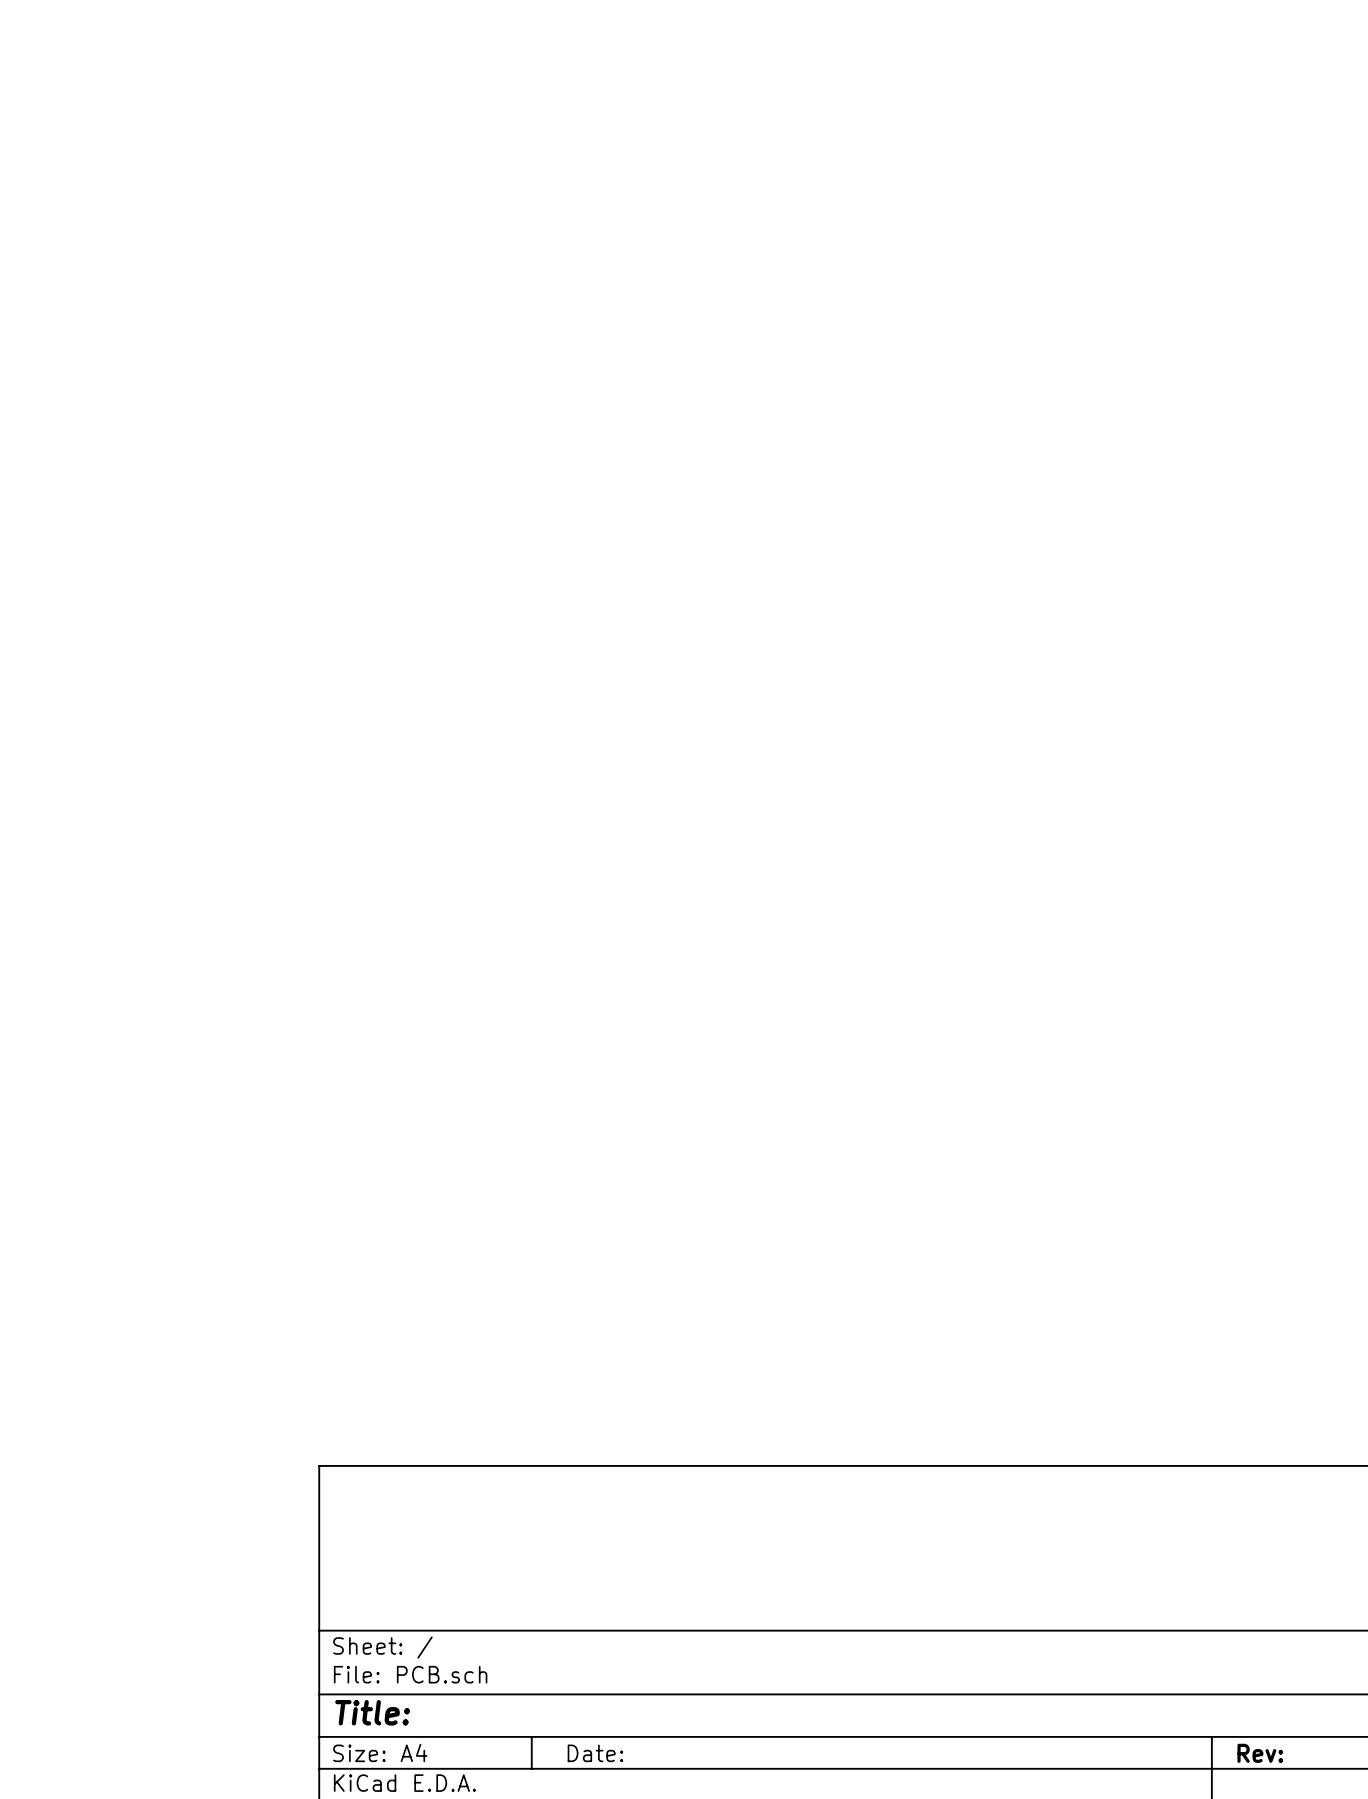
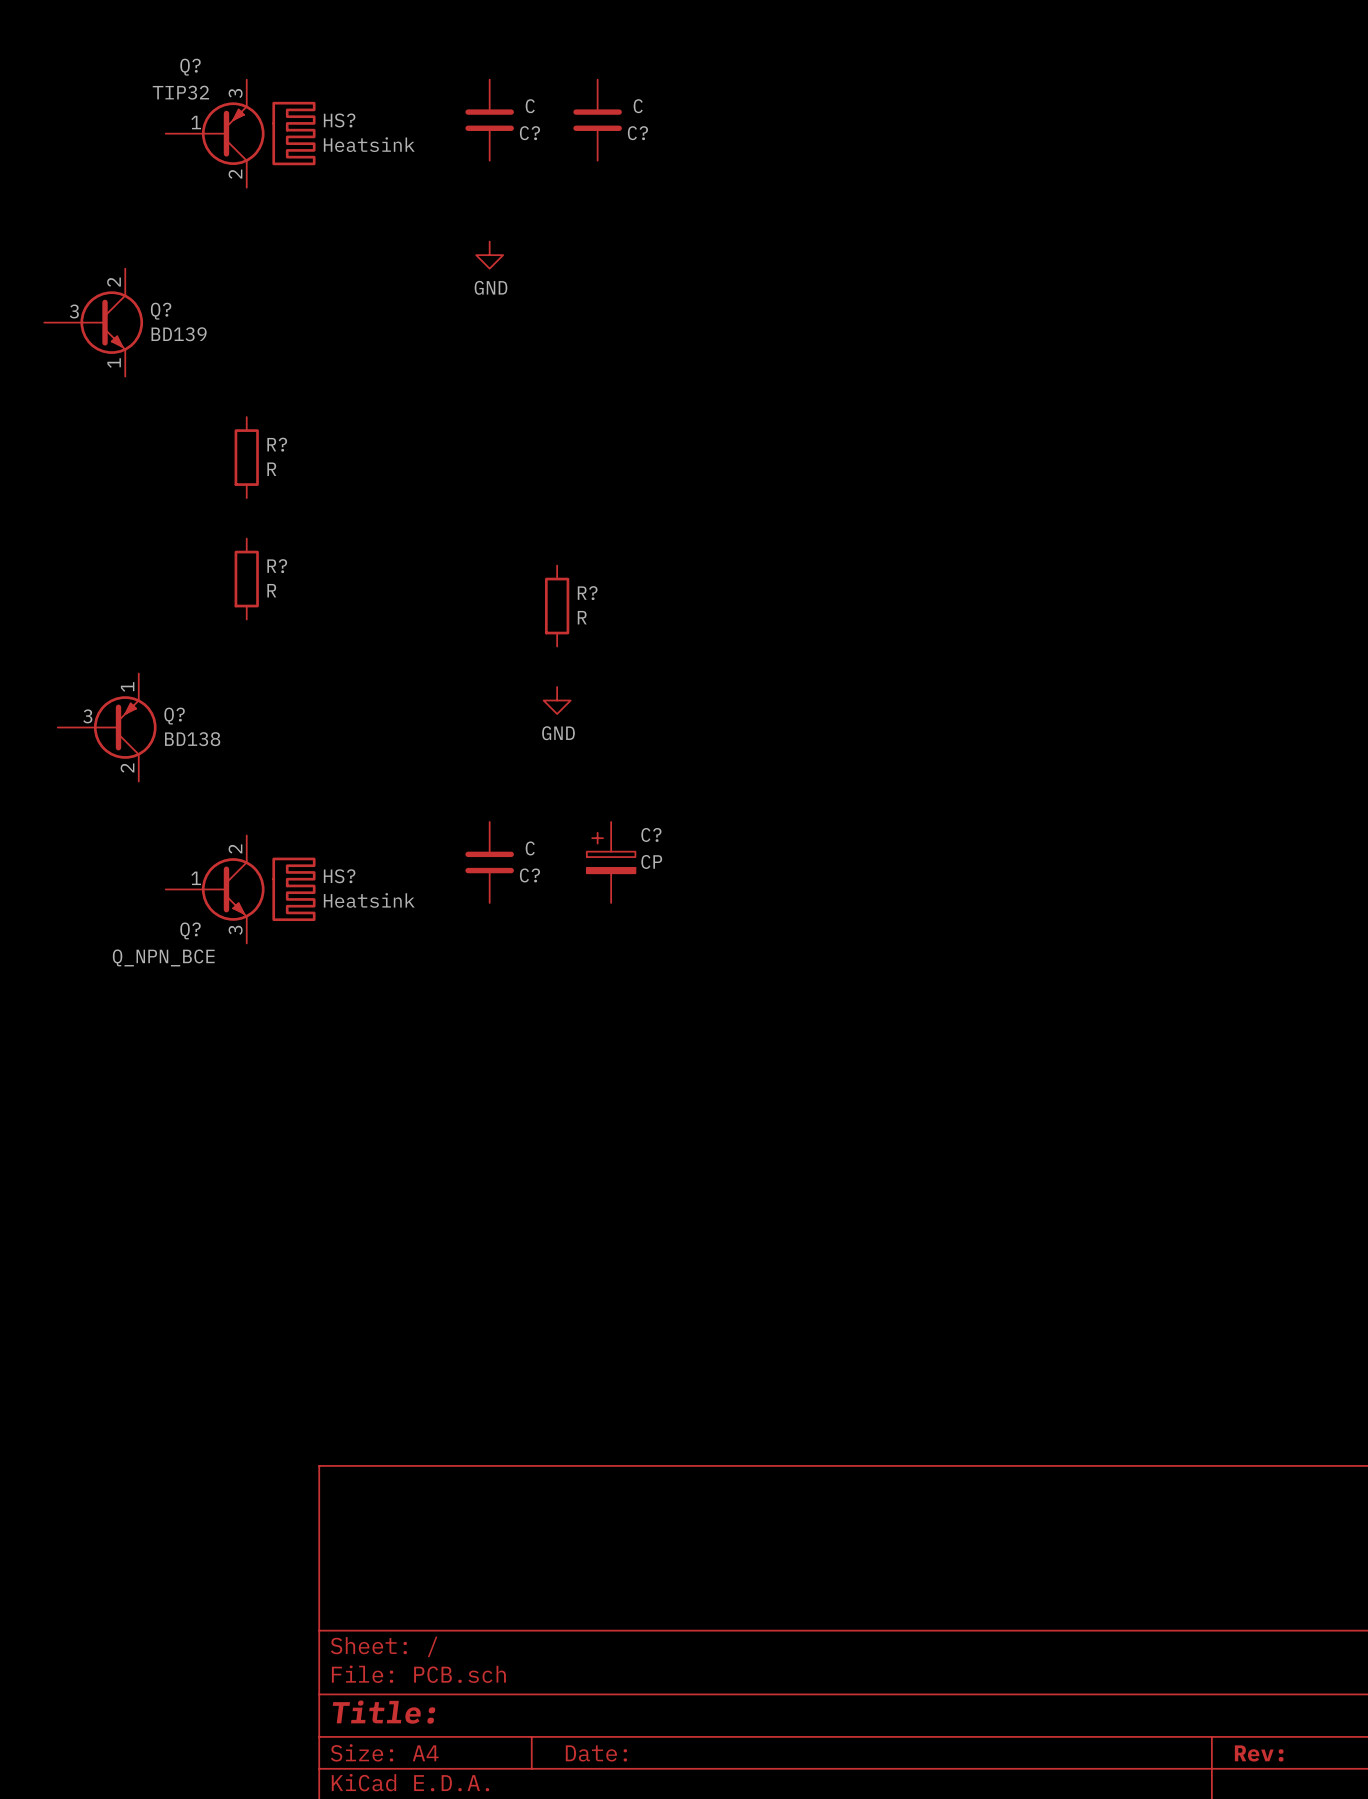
C?: none -> C (489, 120)
C?: none -> C (597, 120)
Q?: none -> TIP32 (215, 133)
HS?: none -> Heatsink (293, 133)
power symbol: none -> GND (489, 255)
Q?: none -> BD139 (93, 322)
R?: none -> R (246, 457)
R?: none -> R (246, 579)
R?: none -> R (557, 606)
power symbol: none -> GND (557, 700)
Q?: none -> BD138 (107, 727)
C?: none -> C (489, 862)
C?: none -> CP (611, 862)
Q?: none -> Q_NPN_BCE (215, 889)
HS?: none -> Heatsink (293, 889)

